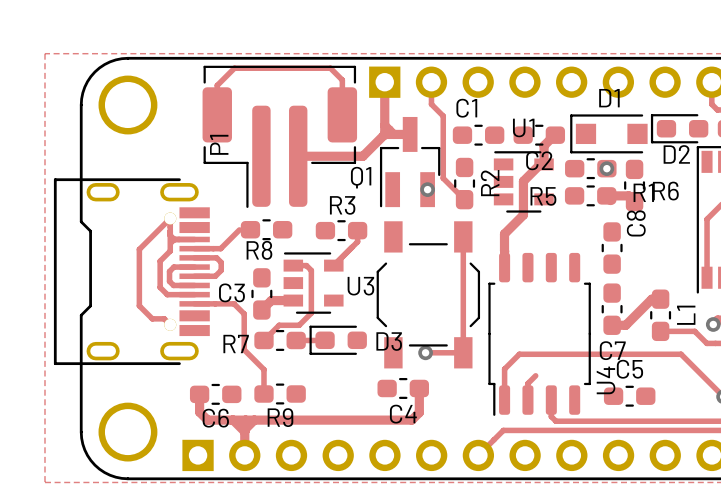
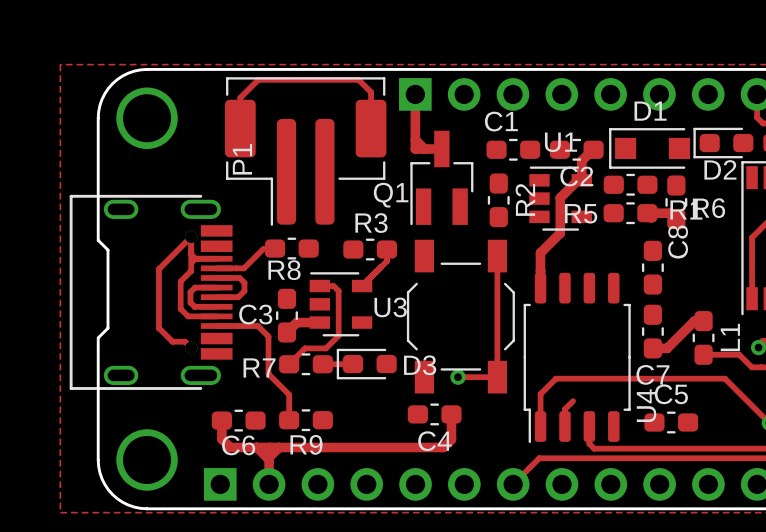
track: (431, 82) (431, 104) (443, 116) (443, 178) (464, 199) -> none
track: (389, 130) (362, 156) (298, 156) -> none
via: (606, 168) -> none
via: (427, 189) -> none

